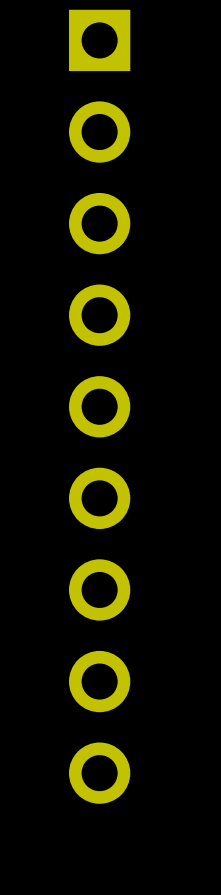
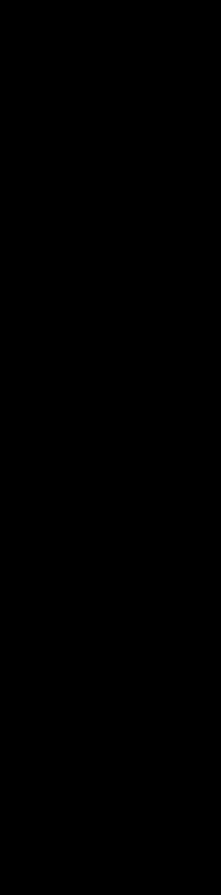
part: (99, 406) -> none

